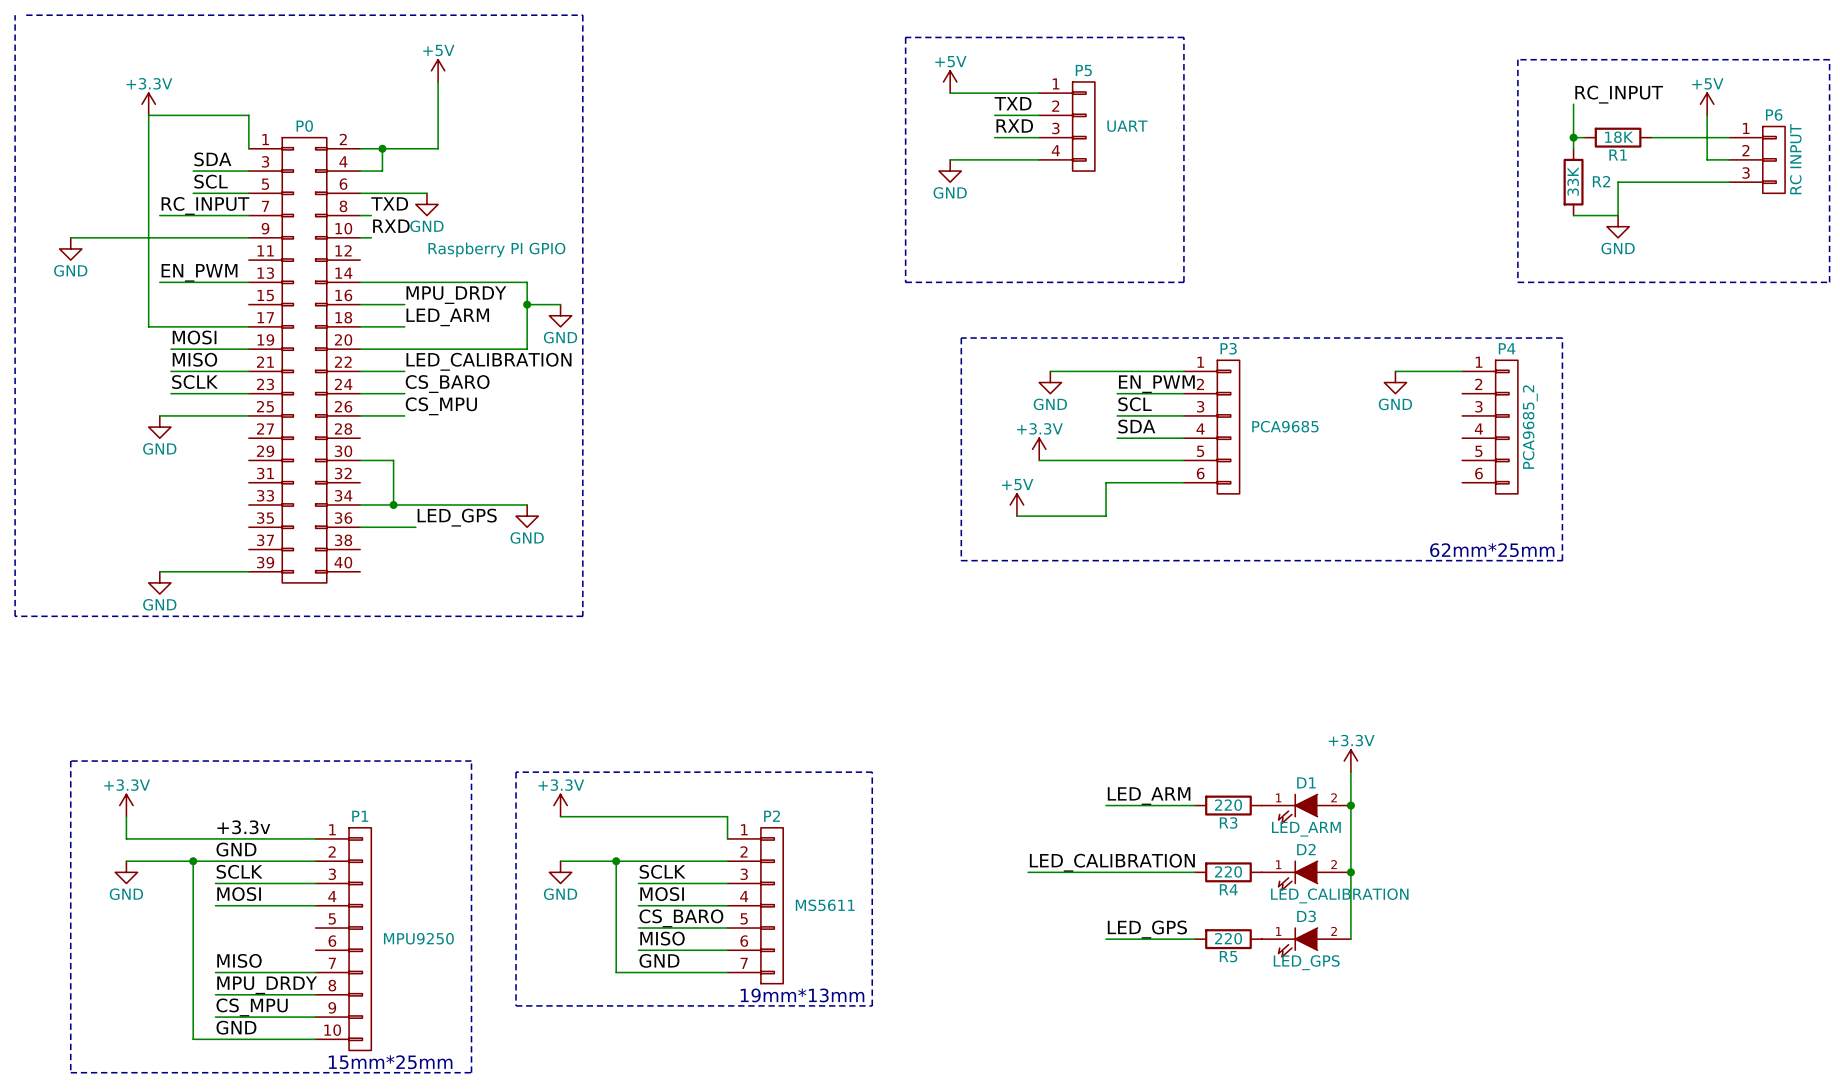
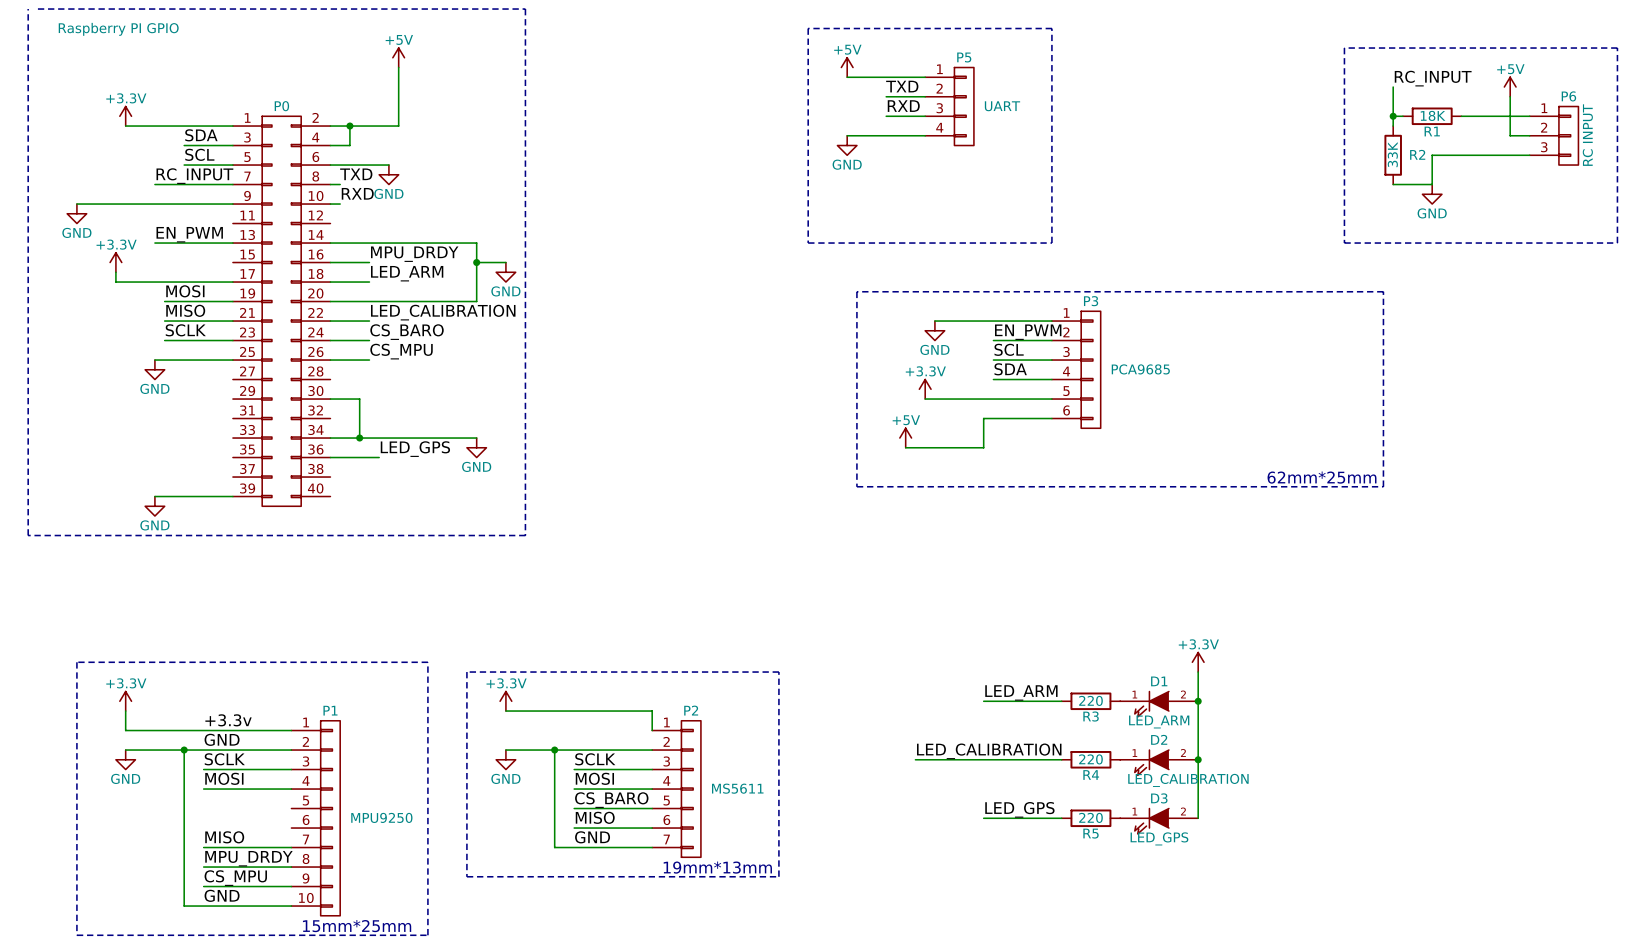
power symbol position: +3.3V (148, 104) -> +3.3V (125, 116)
wire: (248, 148) (248, 115) (148, 115) (148, 326) -> (232, 126) (125, 126)
P0 value position: Raspberry PI GPIO (496, 249) -> Raspberry PI GPIO (118, 29)
power symbol: none -> +3.3V (115, 262)
wire: none -> (115, 272) (115, 282) (145, 282)
wire: (1395, 371) (1462, 371) -> none
power symbol: GND (1395, 382) -> none
P4: PCA9685_2 (1490, 427) -> none

